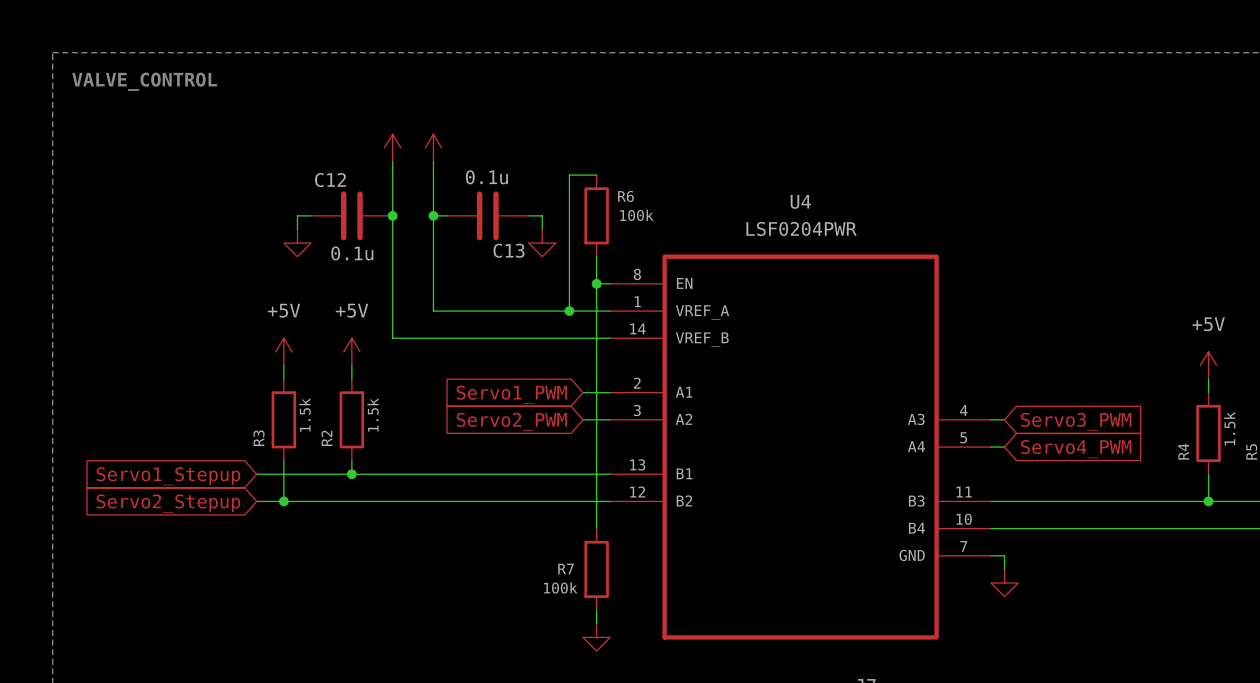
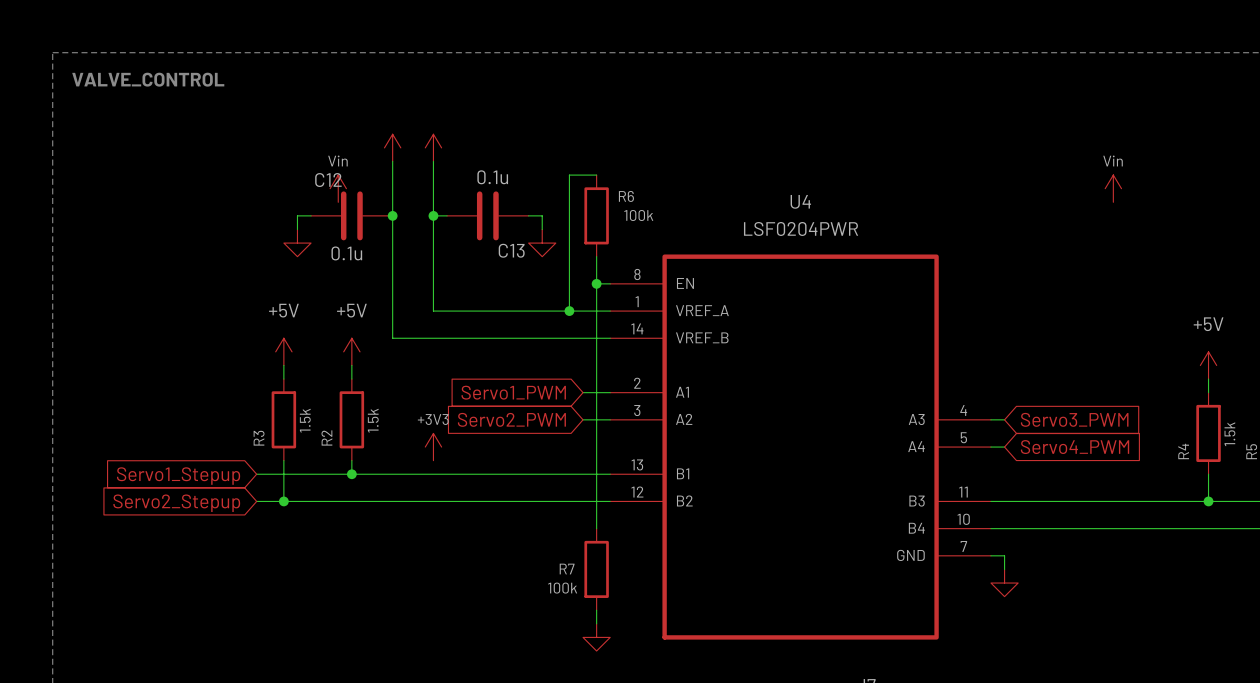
power symbol: none -> Vin (338, 188)
power symbol: none -> Vin (1113, 188)
power symbol: none -> +3V3 (433, 447)

